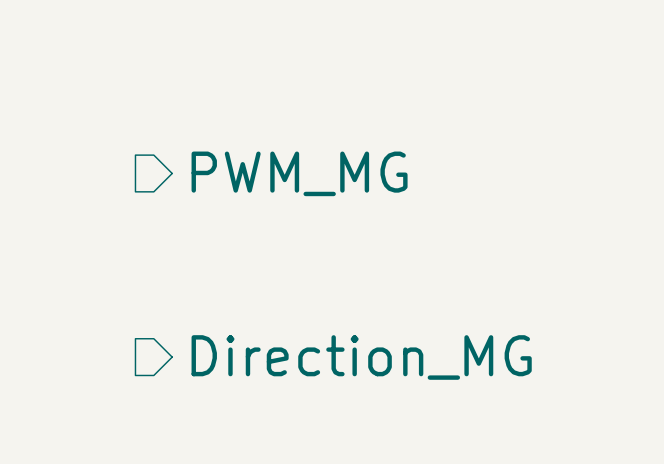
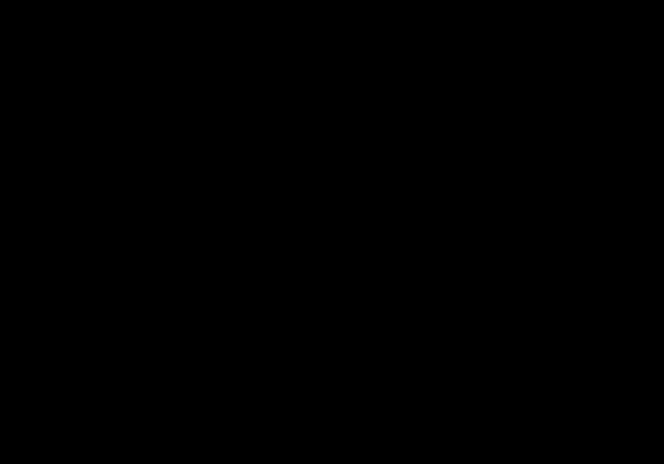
sheet pin: PWM_MG (299, 173) -> none
sheet pin: Direction_MG (361, 357) -> none

